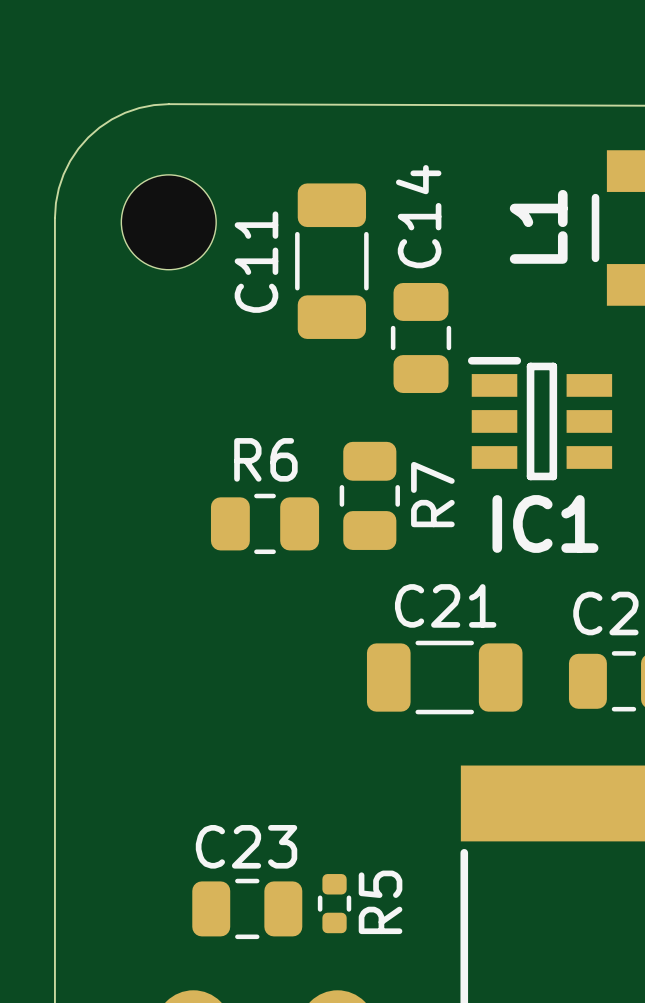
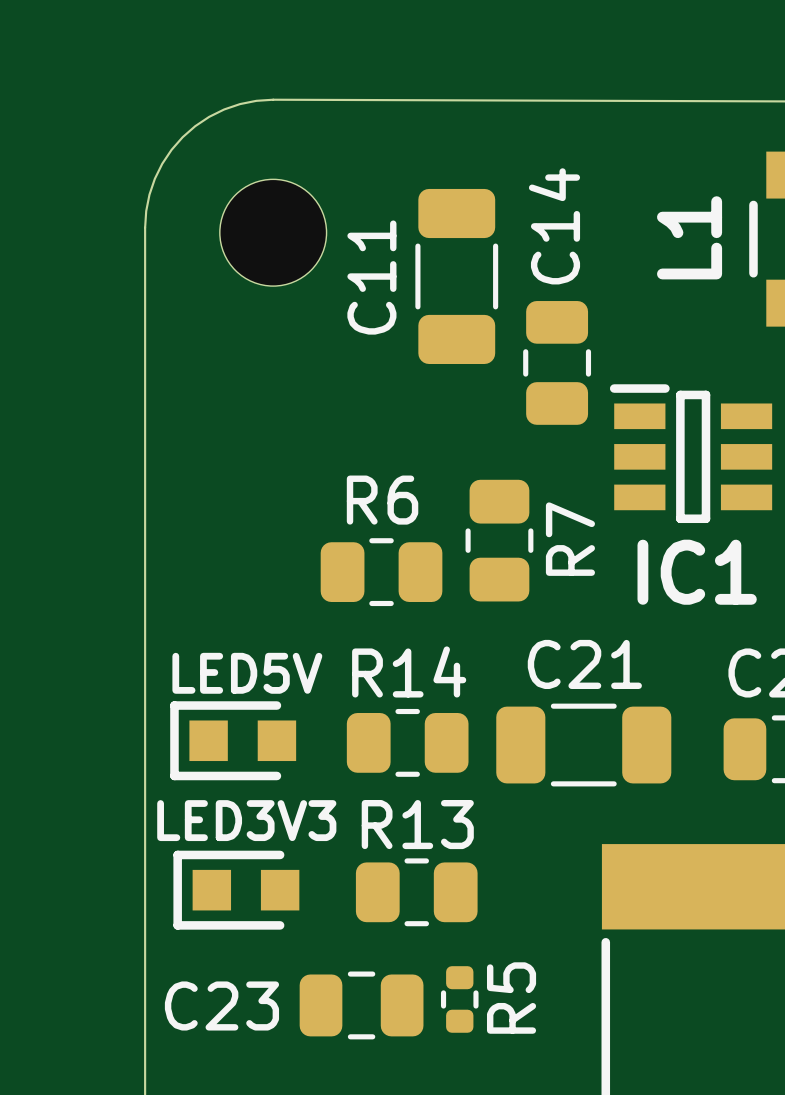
LED5V: none -> (233, 740)
R14: none -> (407, 742)
LED3V3: none -> (236, 890)
R13: none -> (416, 892)
C23 name position: C23 (246, 846) -> C23 (221, 1005)

